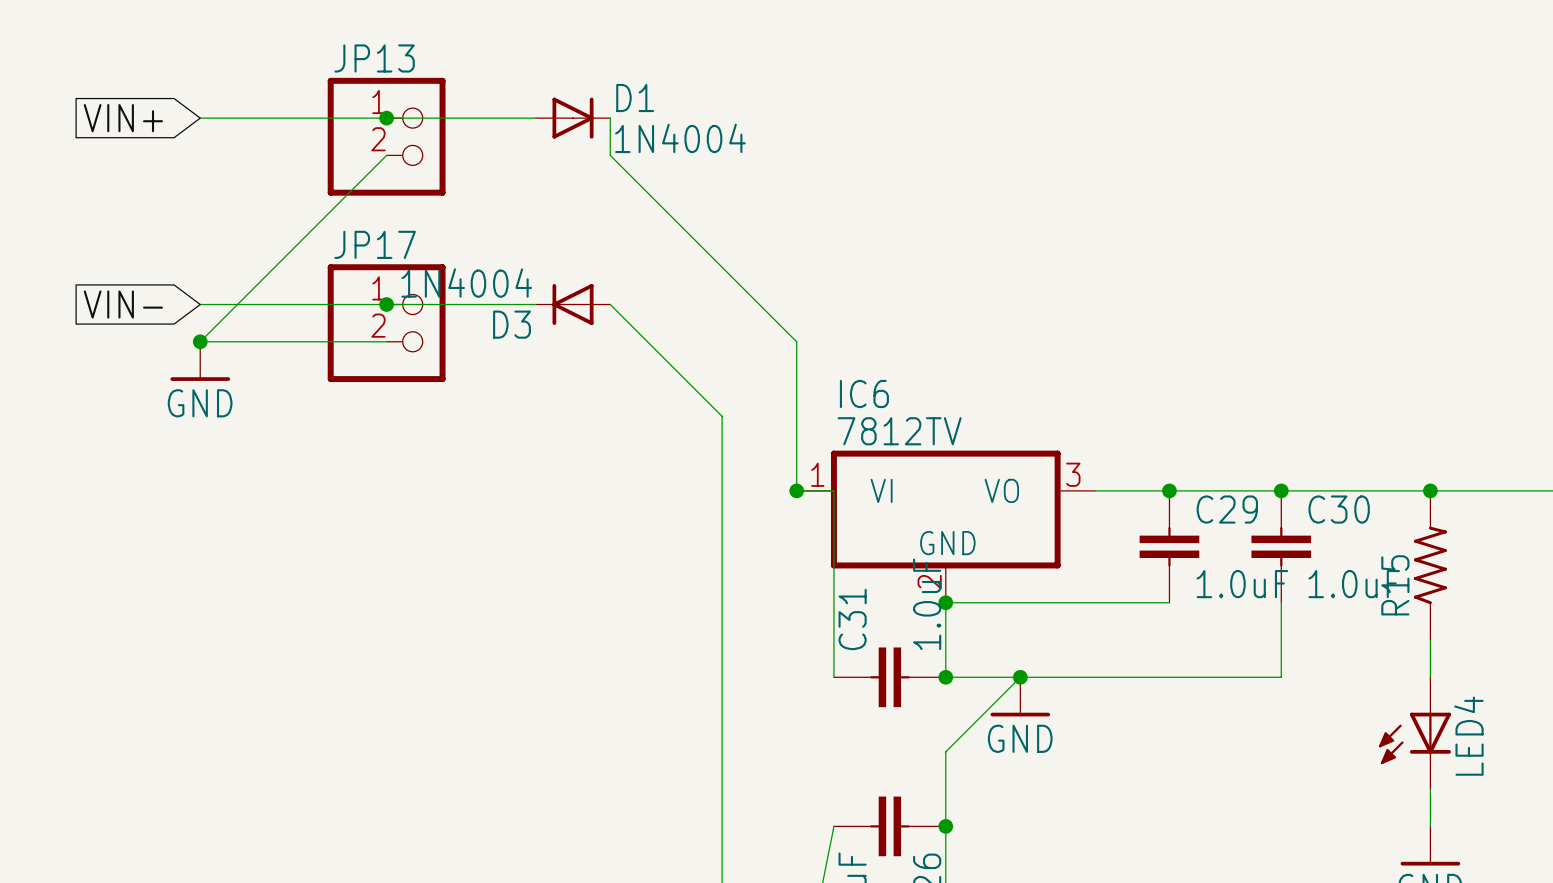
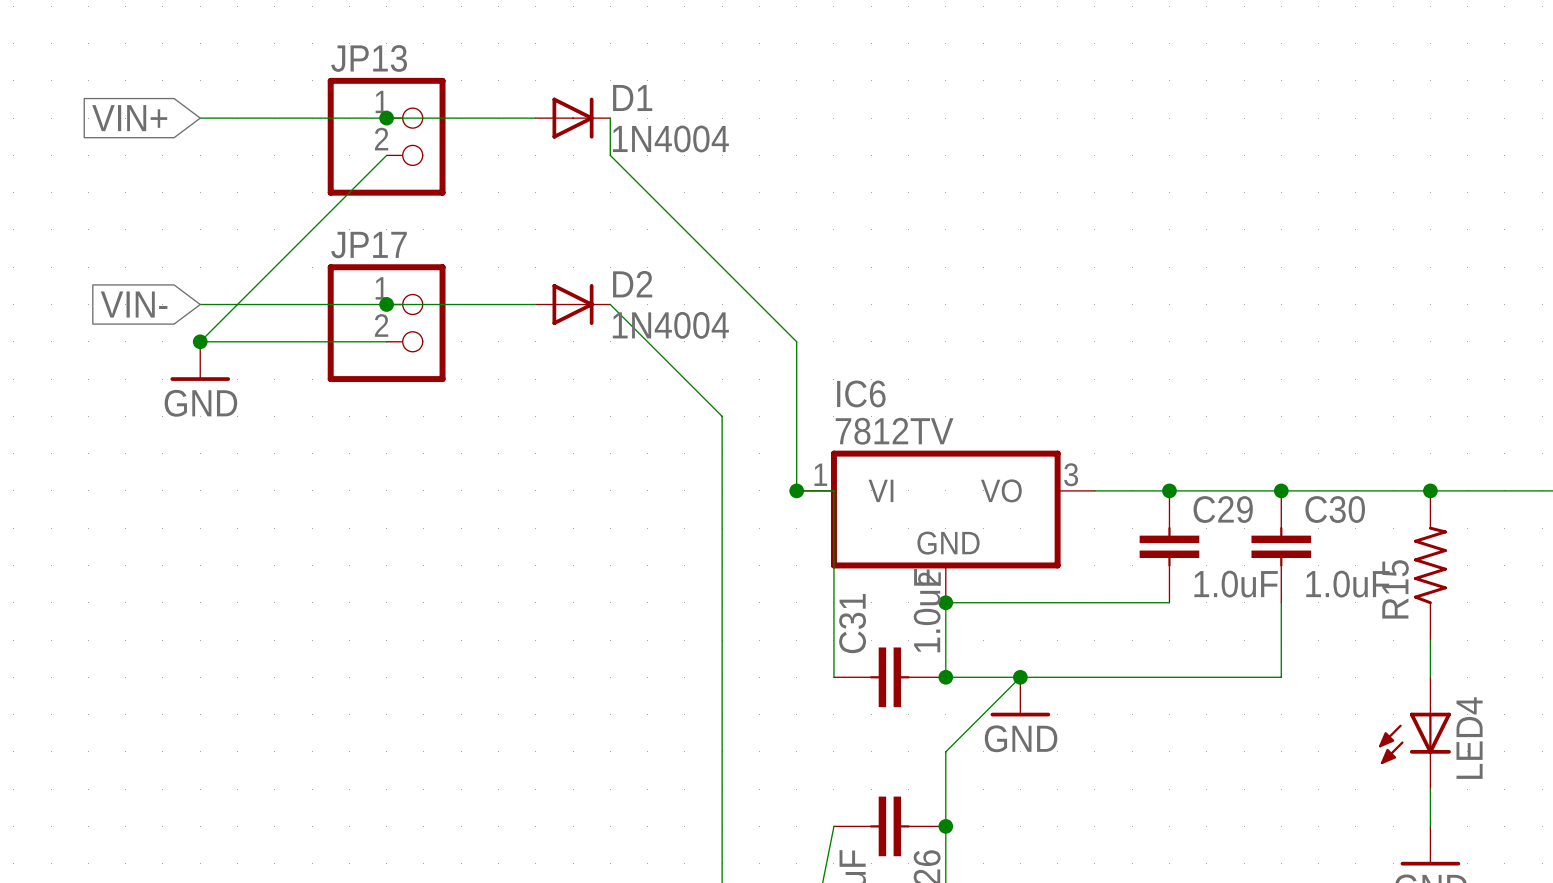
D3: 1N4004 (573, 304) -> none
D2: none -> 1N4004 (573, 304)

